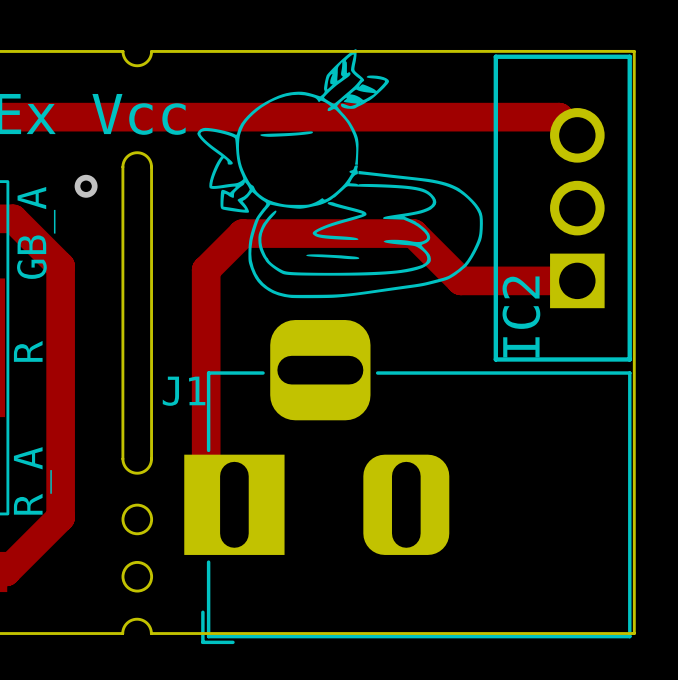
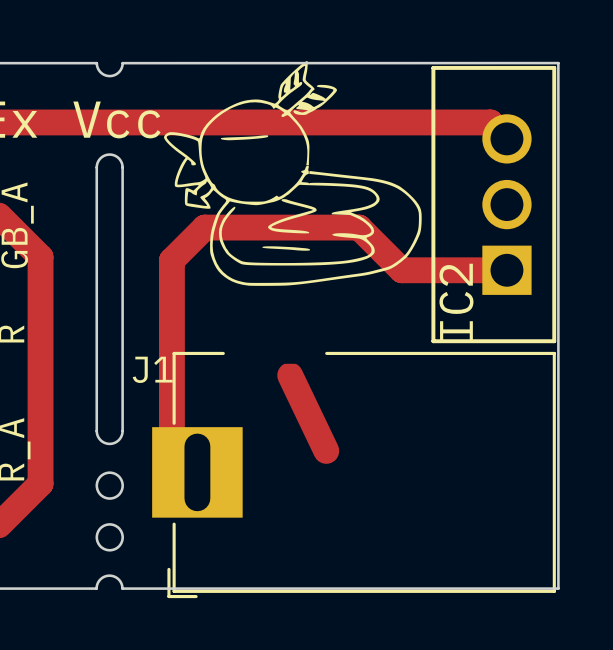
via: (86, 186) -> none
J1 footprint: [184, 320, 632, 645] -> [152, 337, 556, 599]
track: none -> (290, 375) (326, 450)

